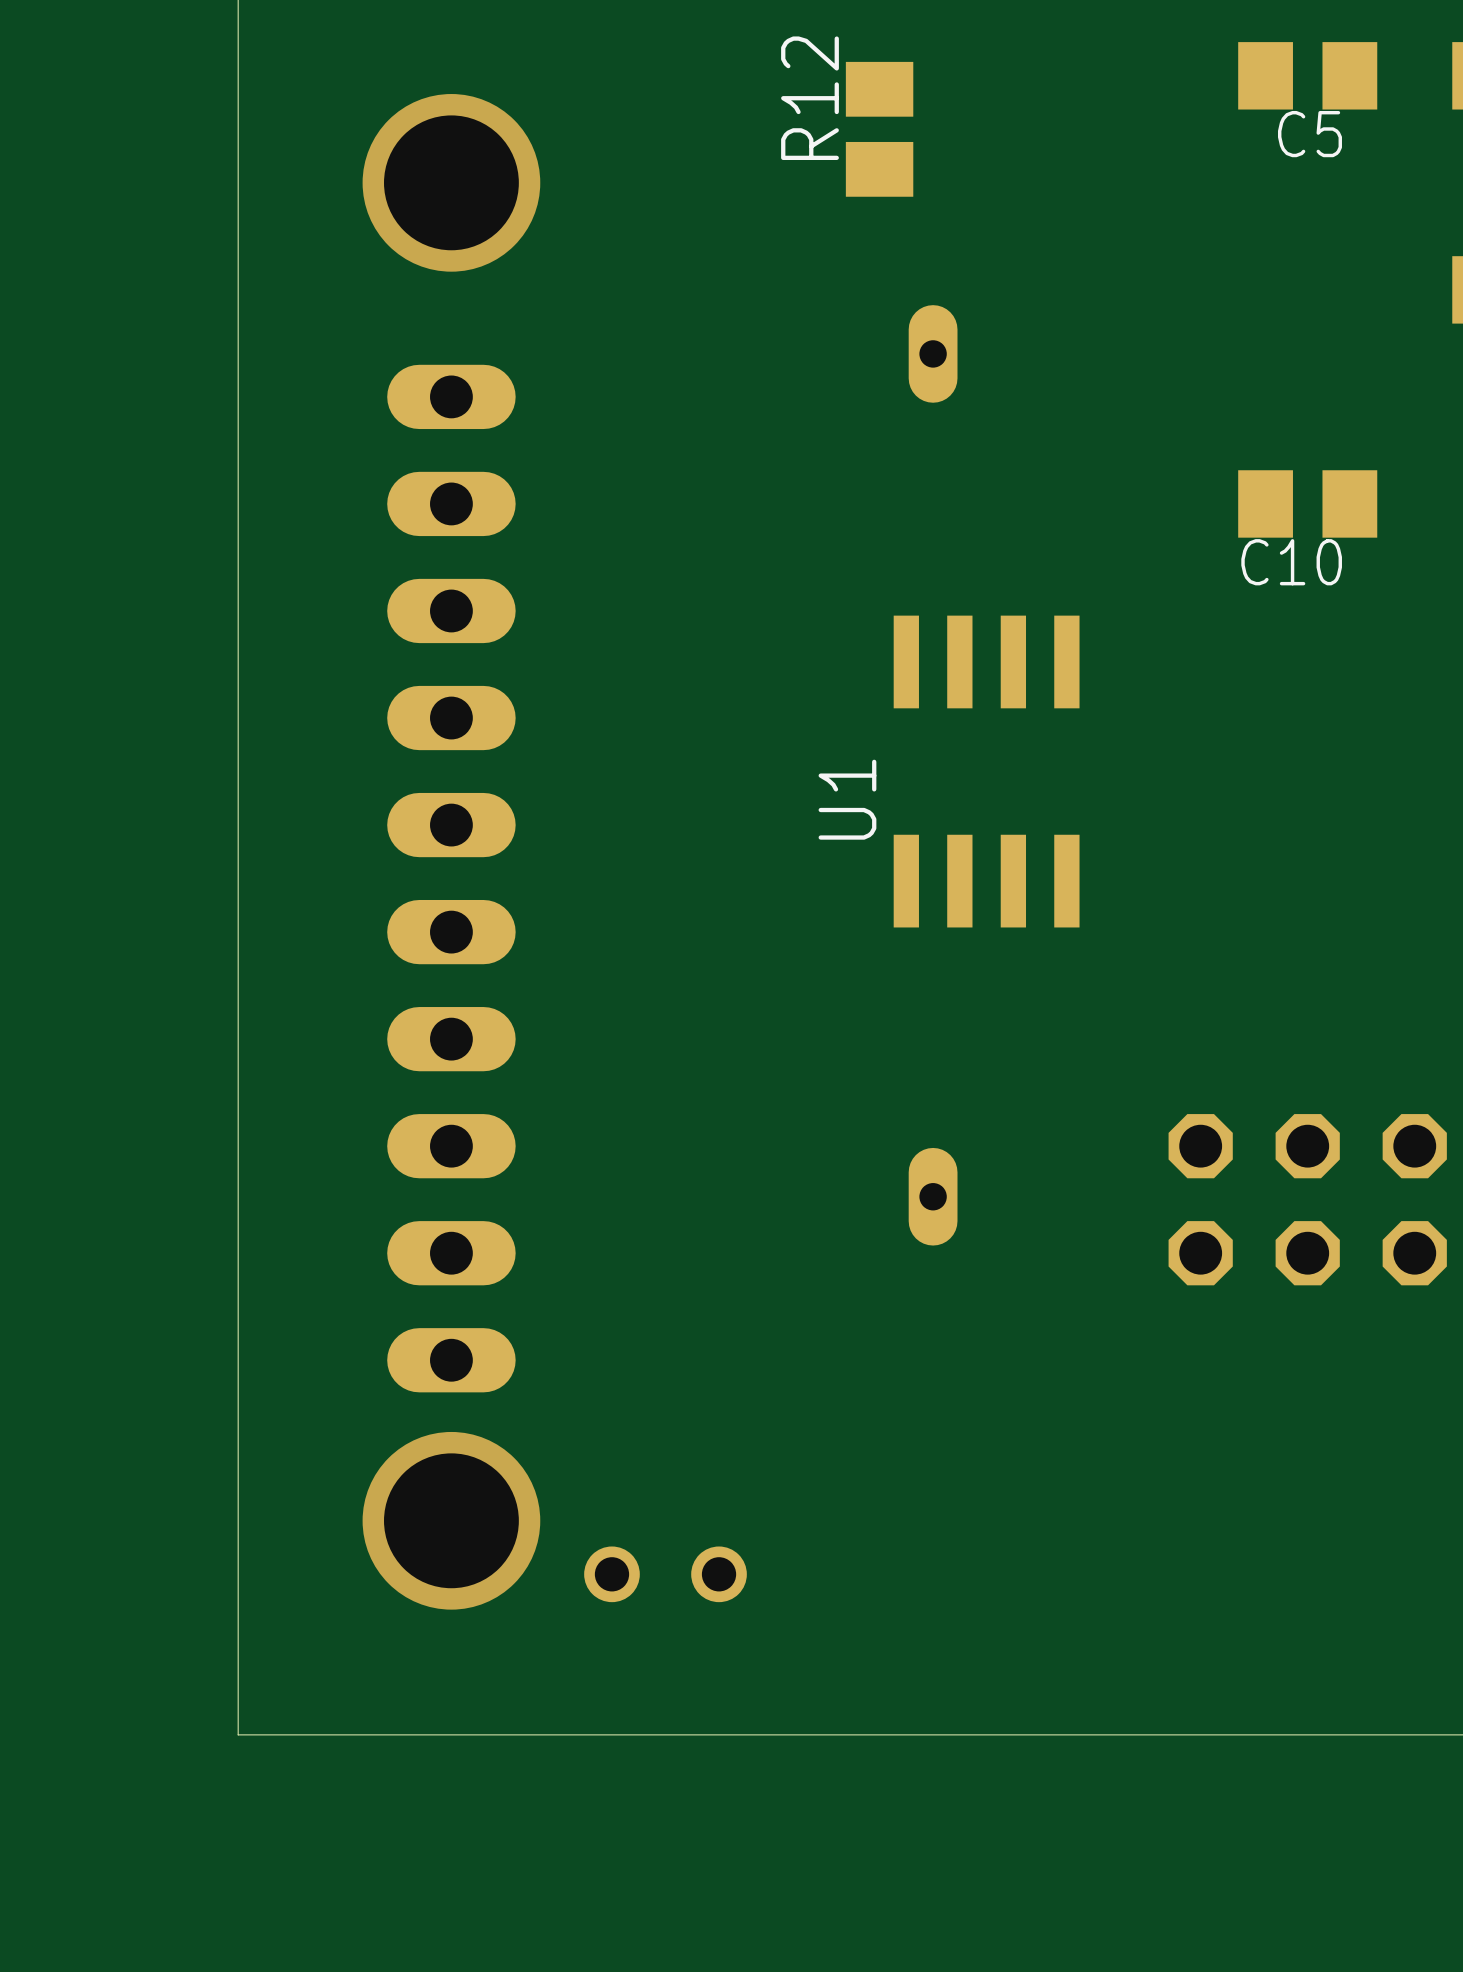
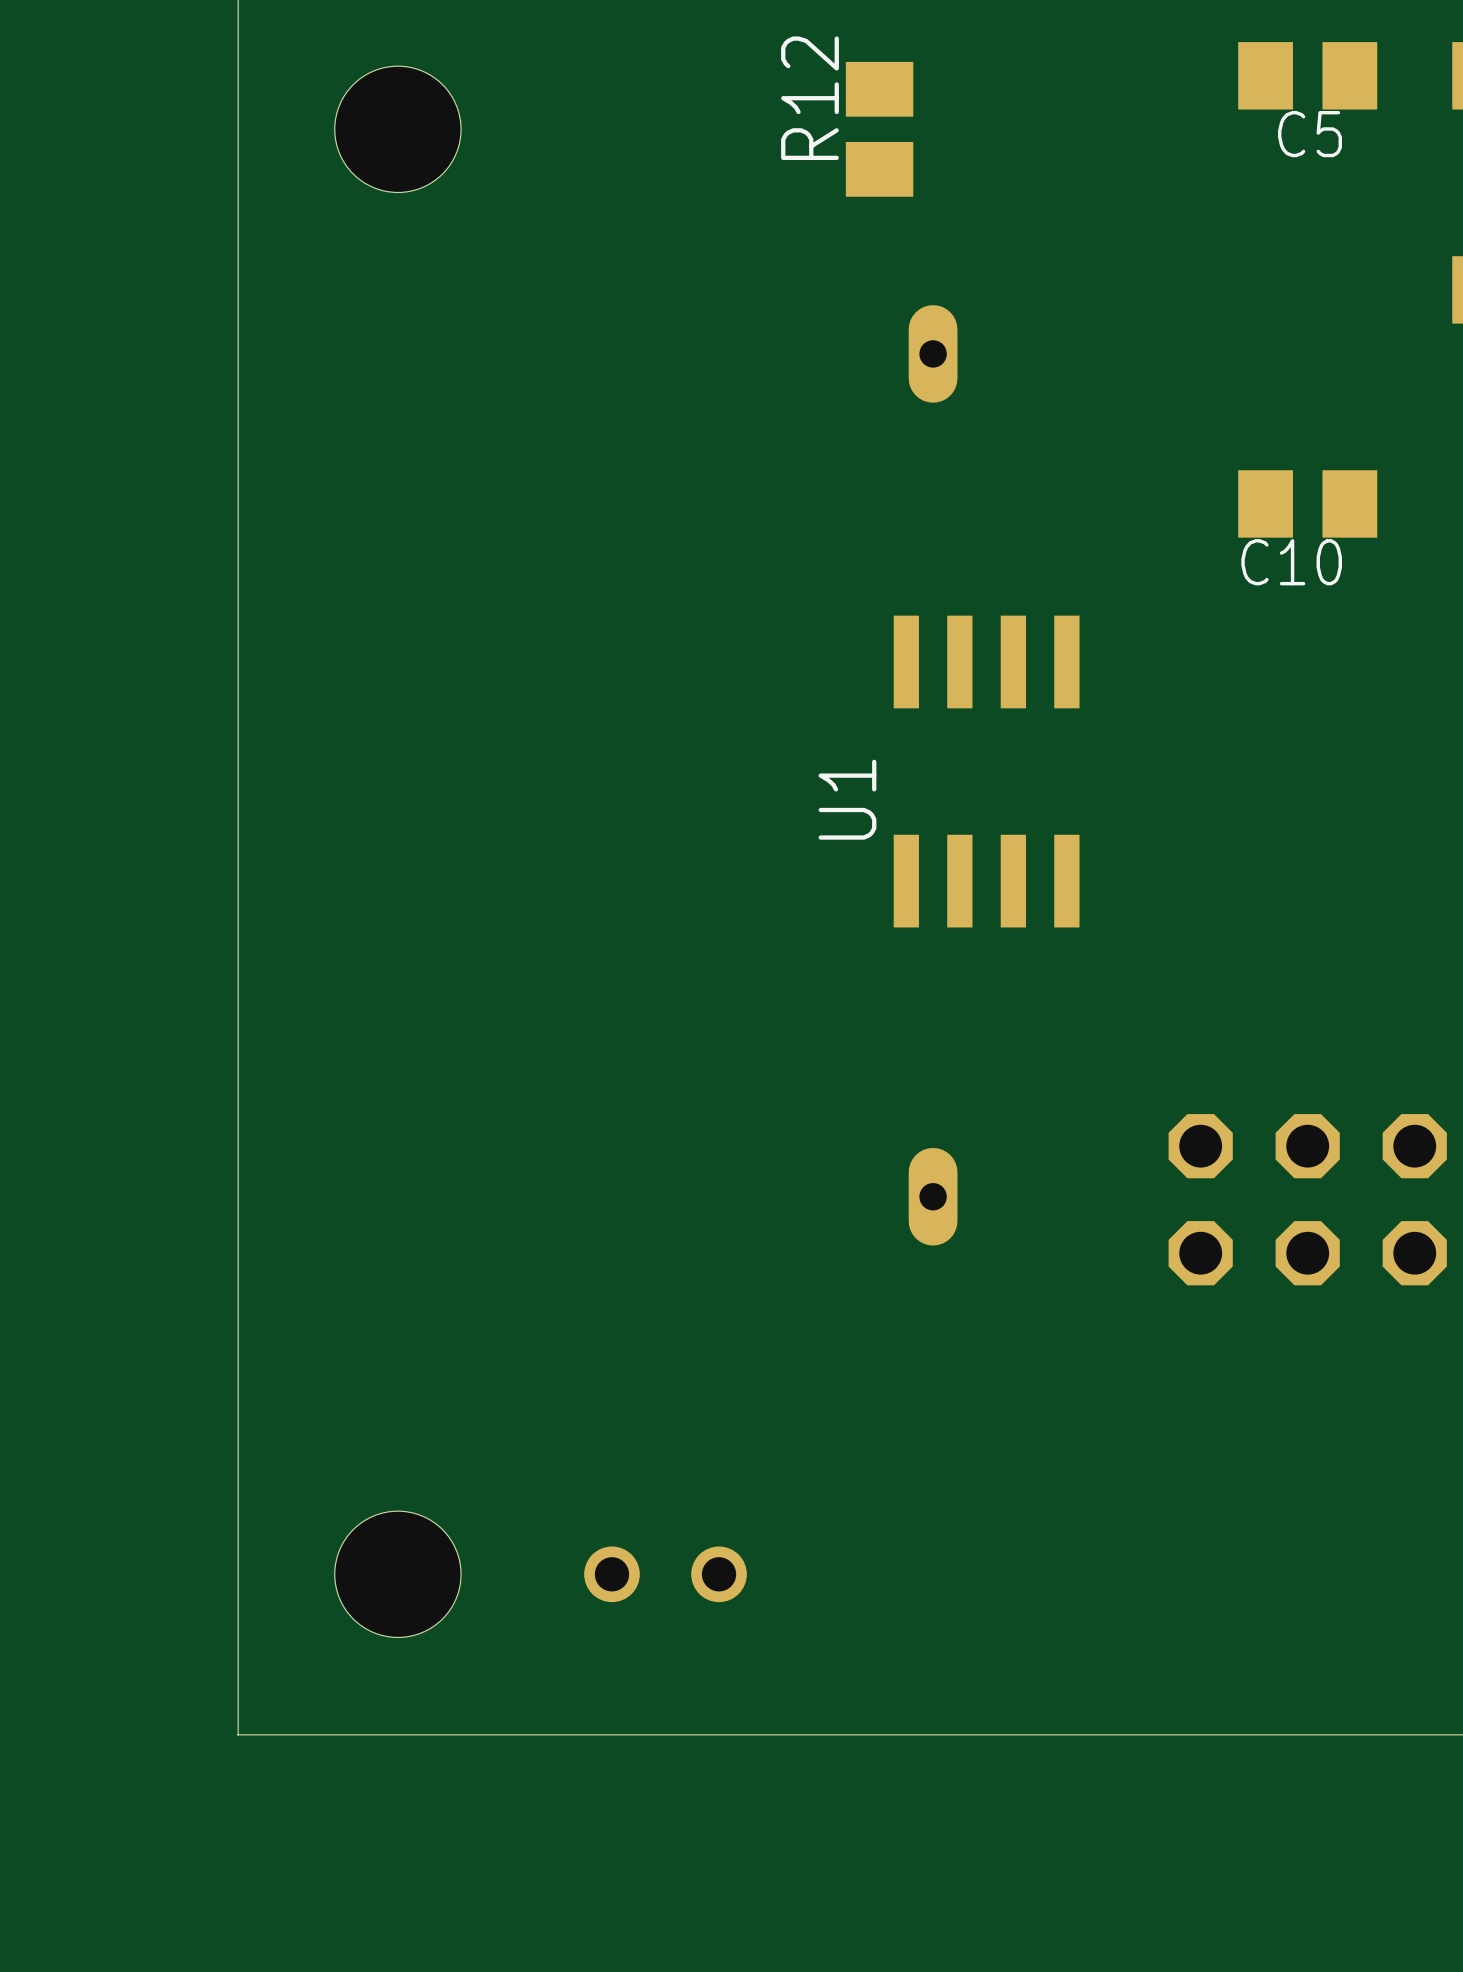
hole: none -> (397, 129)
via: (451, 182) -> none
part: (451, 878) -> none
via: (451, 1520) -> none
hole: none -> (397, 1574)

